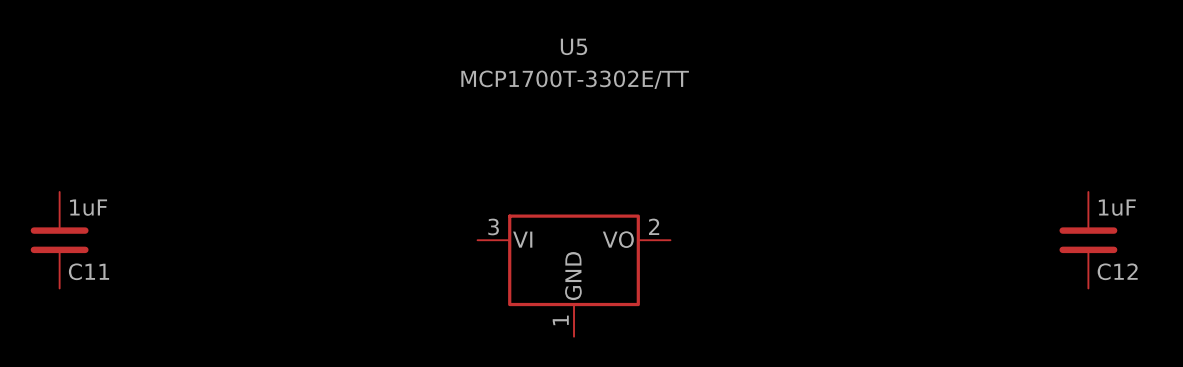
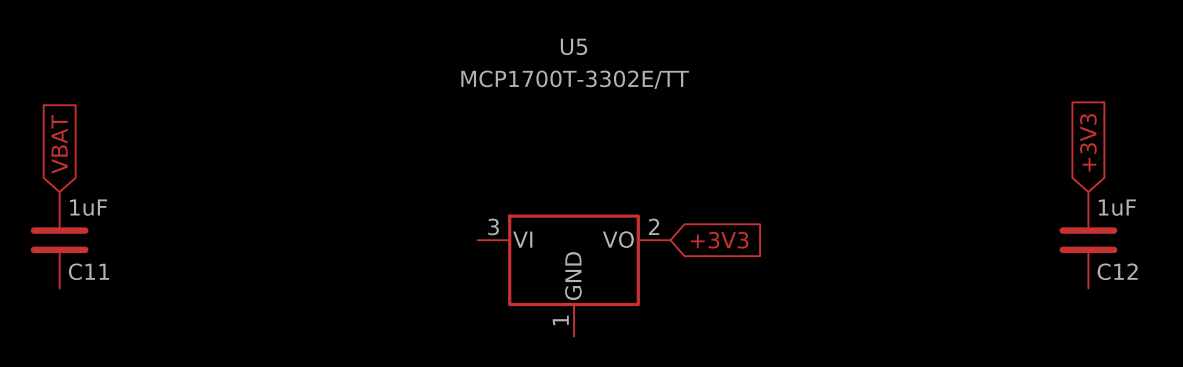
global label: none -> +3V3 (1088, 142)
global label: none -> VBAT (59, 144)
global label: none -> +3V3 (719, 240)

